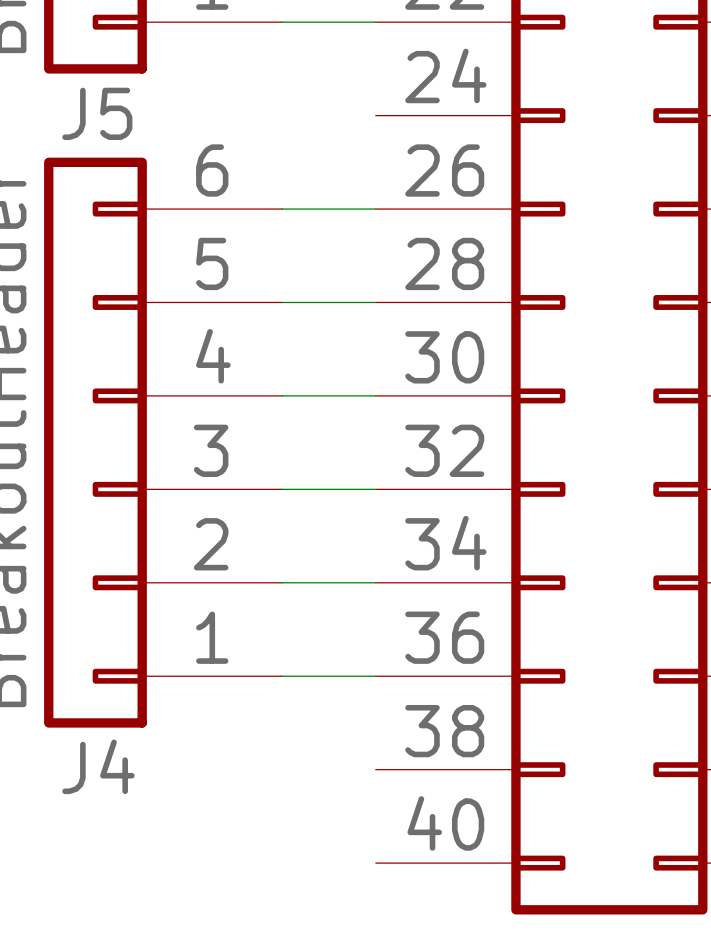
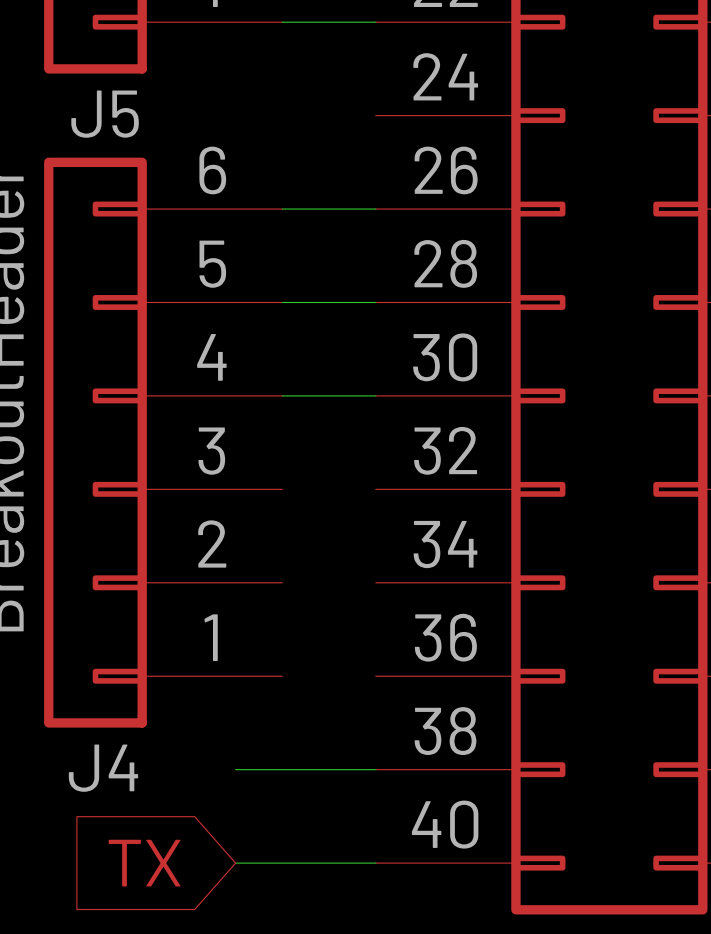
wire: (282, 489) (375, 489) -> none
wire: (282, 582) (375, 582) -> none
wire: (282, 676) (375, 676) -> none
wire: none -> (235, 769) (375, 769)
global label: none -> TX (144, 863)
wire: none -> (235, 863) (375, 863)

